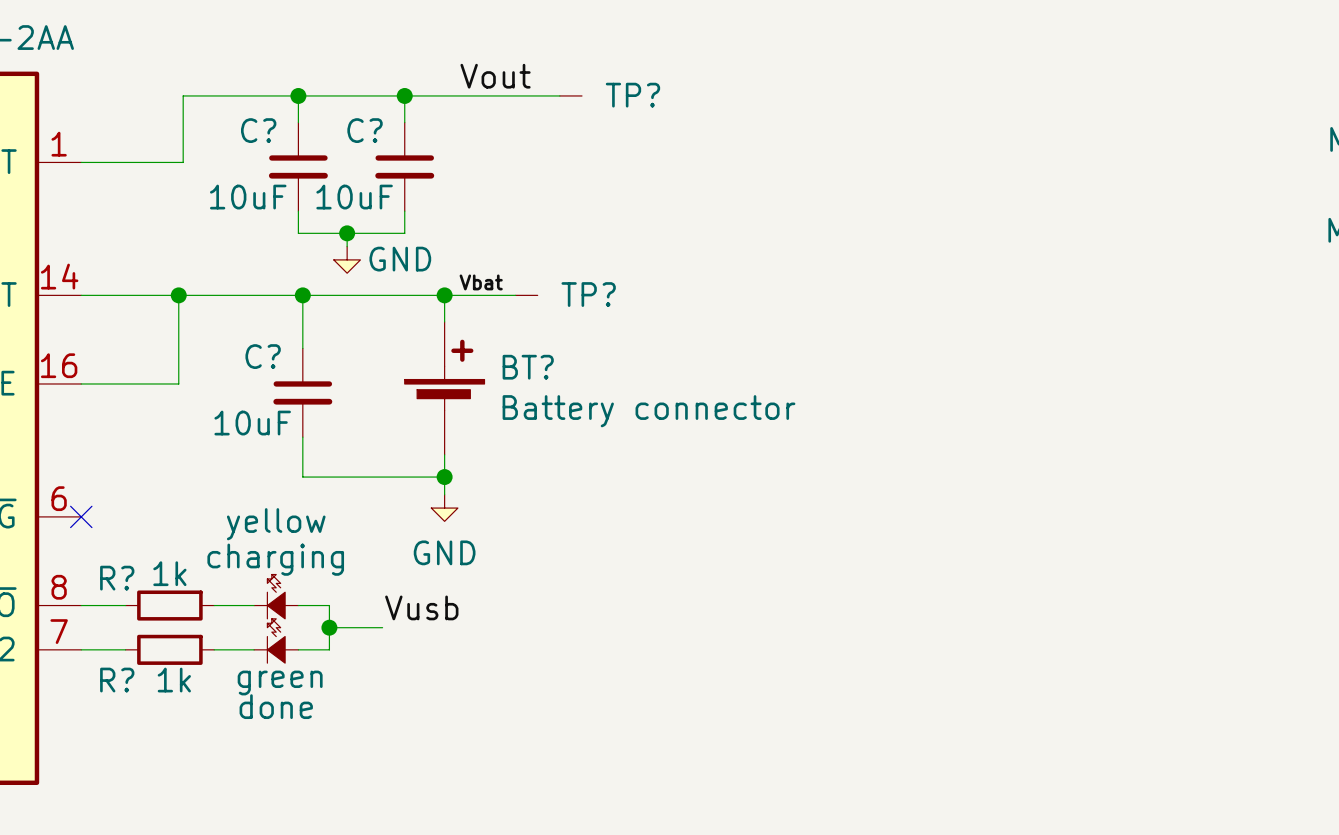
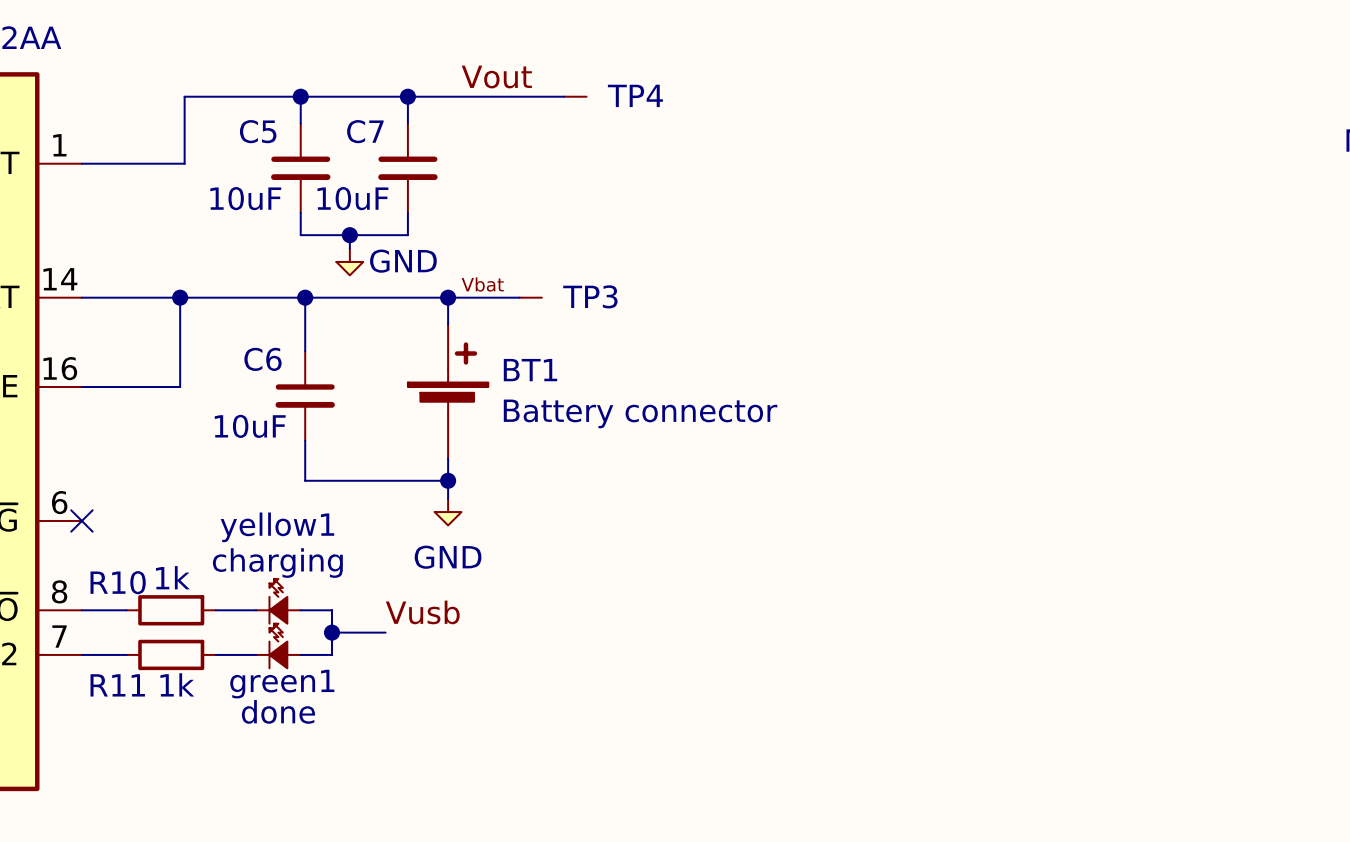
TP? name: TP? (632, 95) -> TP4 (635, 95)
C? name: C? (258, 130) -> C5 (258, 131)
C? name: C? (365, 130) -> C7 (365, 131)
TP? name: TP? (588, 294) -> TP3 (590, 296)
C? name: C? (263, 356) -> C6 (263, 359)
BT? name: BT? (528, 367) -> BT1 (530, 370)
yellow name: yellow (276, 524) -> yellow1 (277, 527)
R? name: R? (117, 578) -> R10 (118, 582)
R? name: R? (117, 680) -> R11 (117, 685)
green name: green (280, 682) -> green1 (282, 684)

